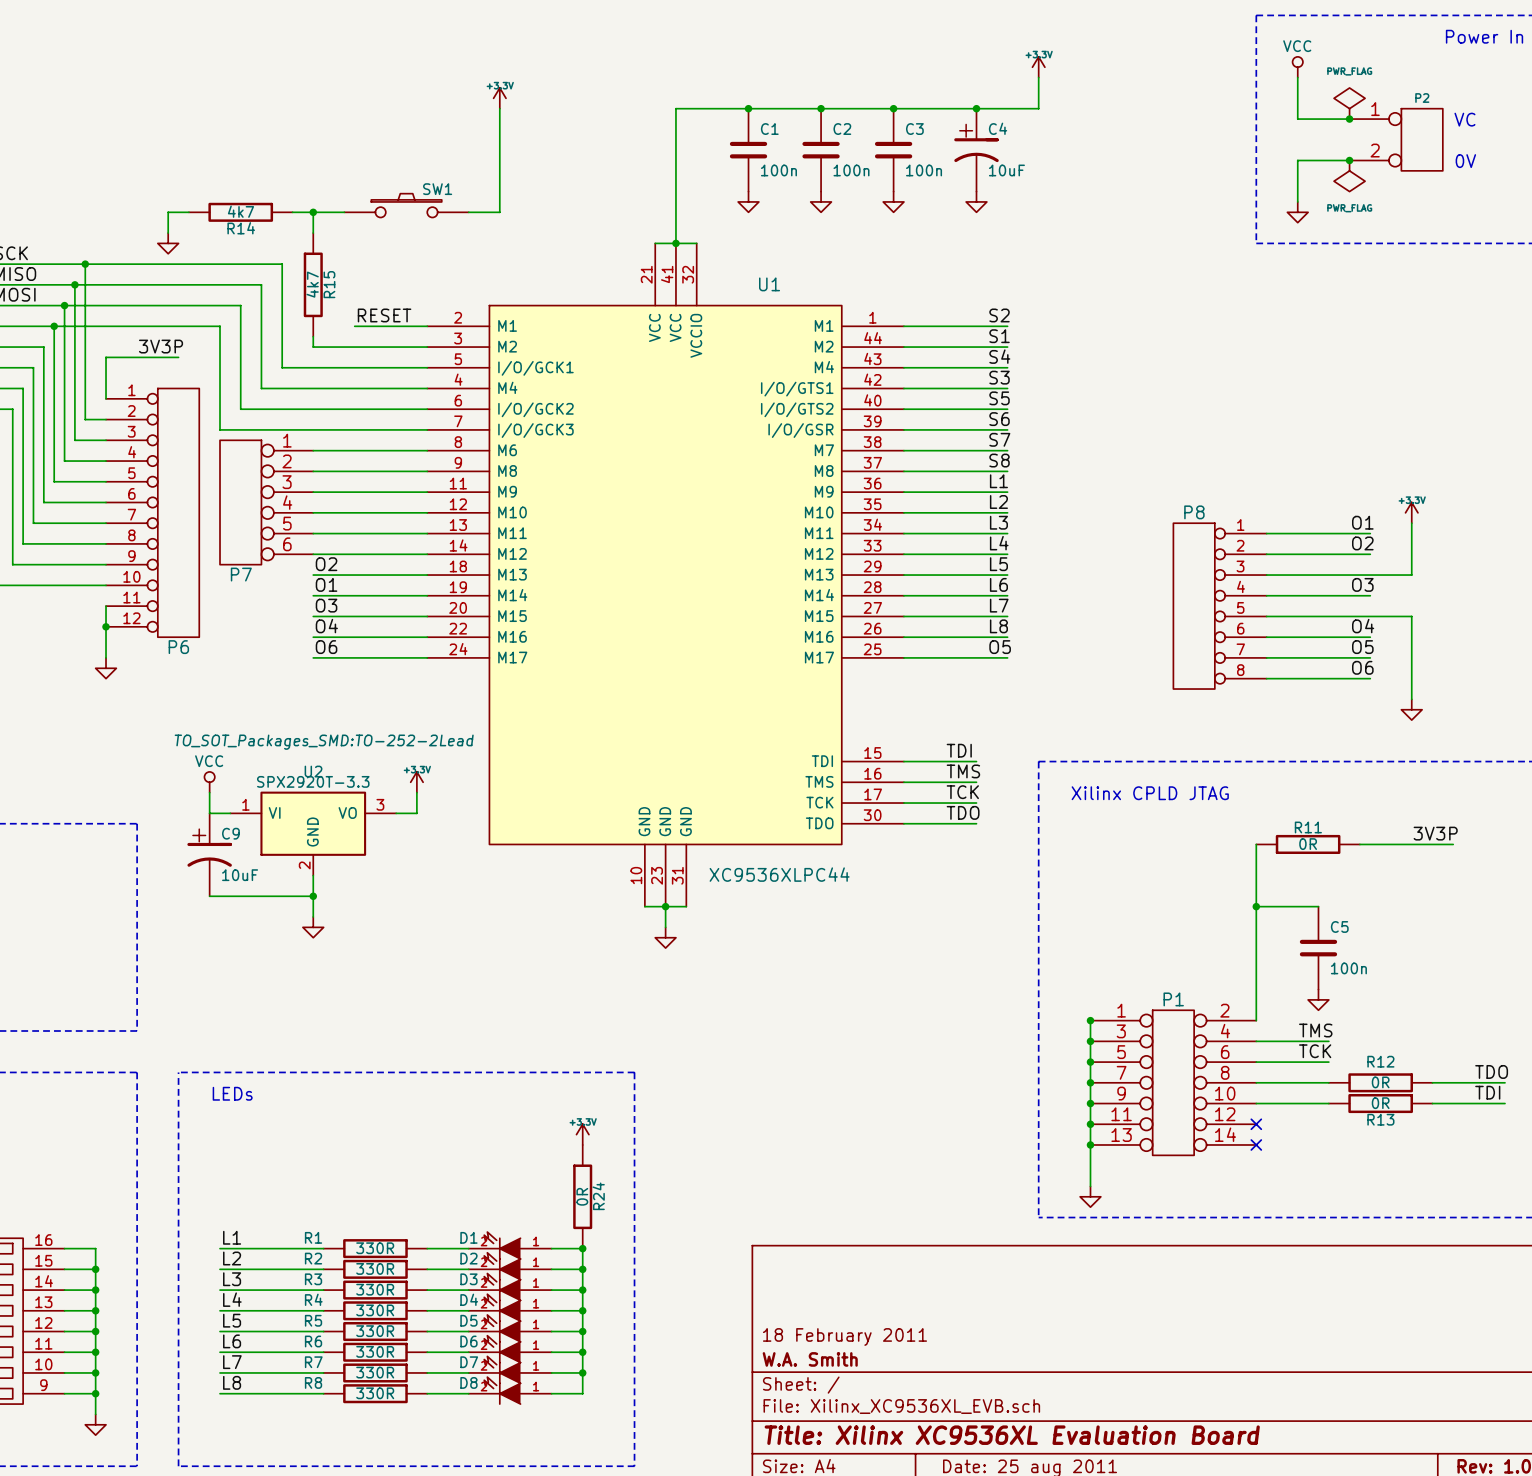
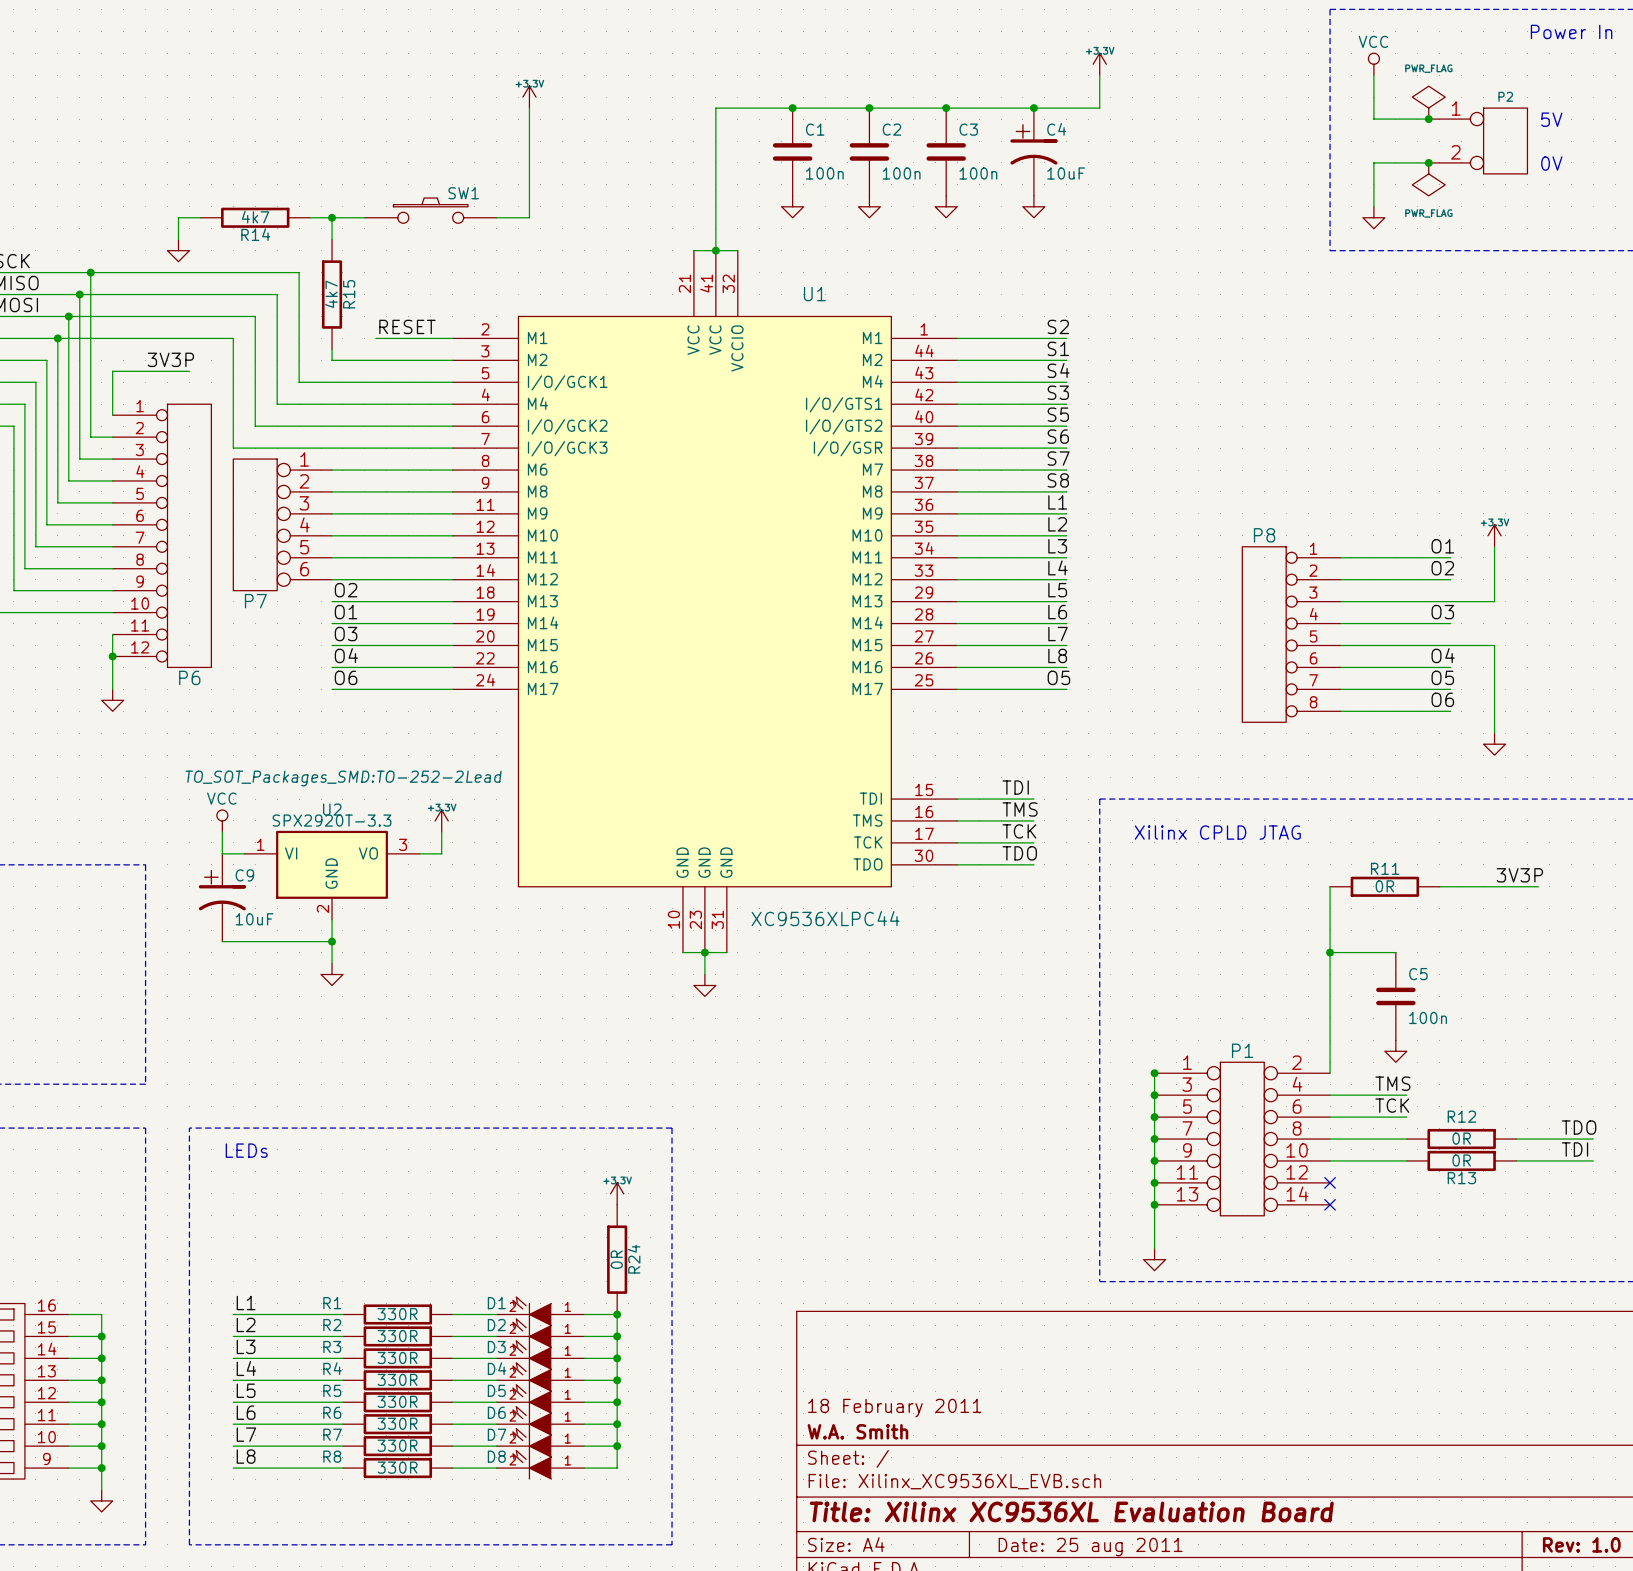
text: VC (1464, 119) -> 5V (1551, 119)

